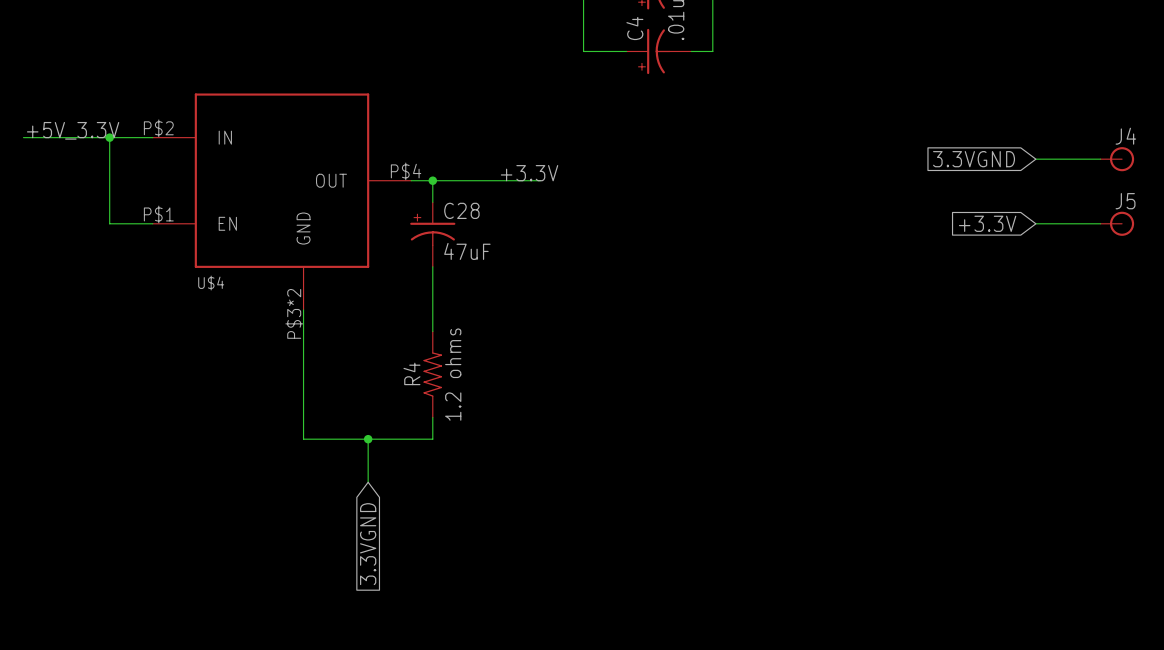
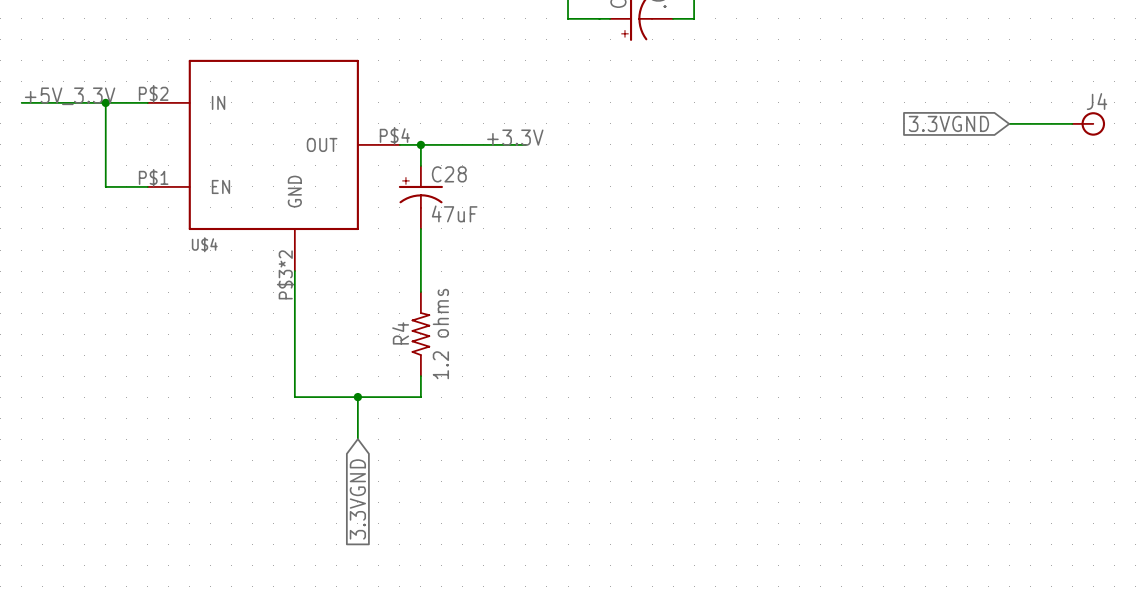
global label: +3.3V (987, 223) -> none
wire: (1035, 223) (1100, 223) -> none
J5: (1117, 223) -> none

